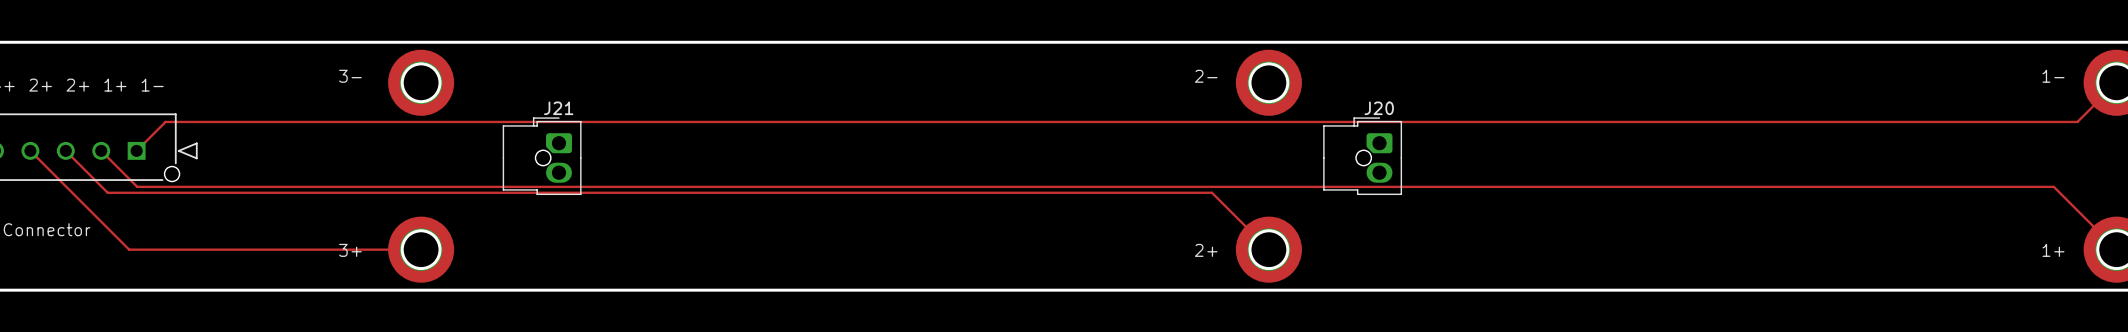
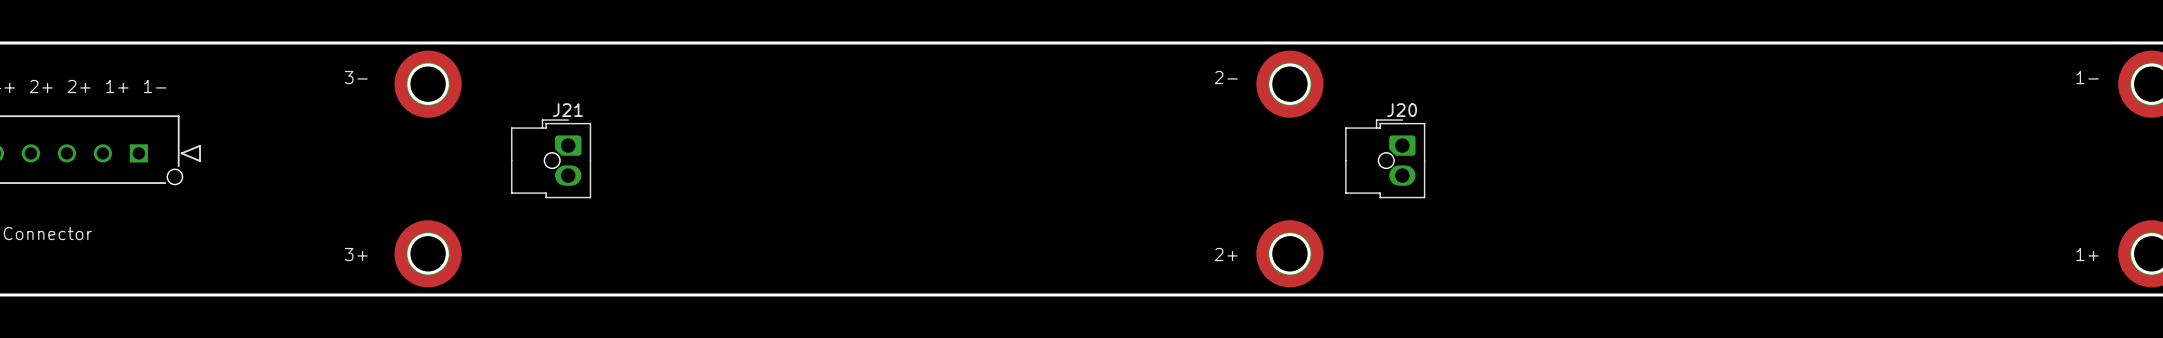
track: (2116, 82) (2077, 121) (165, 121) (136, 150) -> none
track: (30, 150) (129, 249) (421, 249) -> none
track: (65, 150) (107, 192) (1212, 192) (1268, 249) -> none
track: (101, 150) (137, 186) (2053, 186) (2116, 249) -> none

